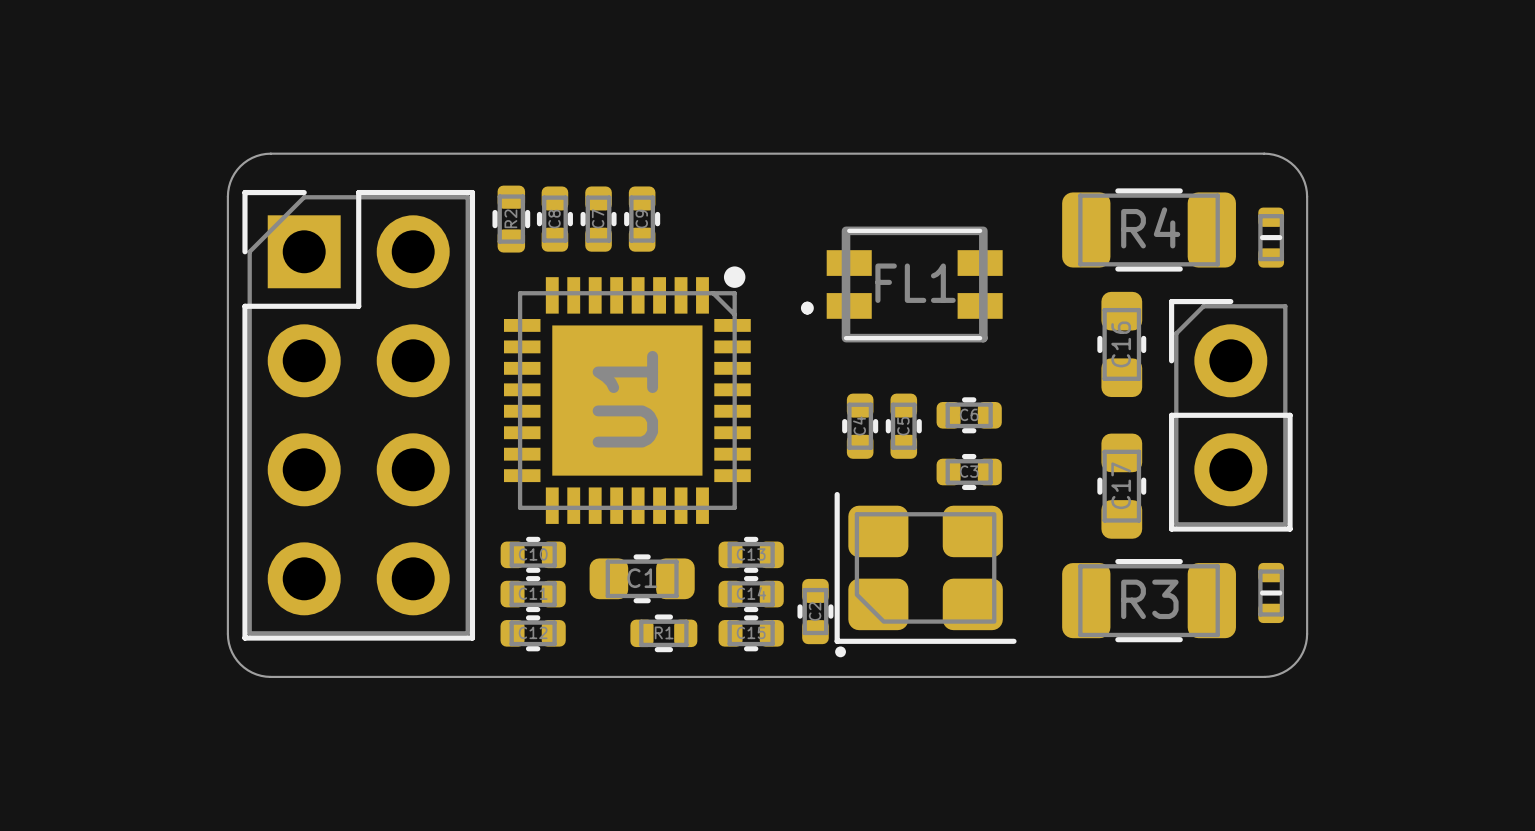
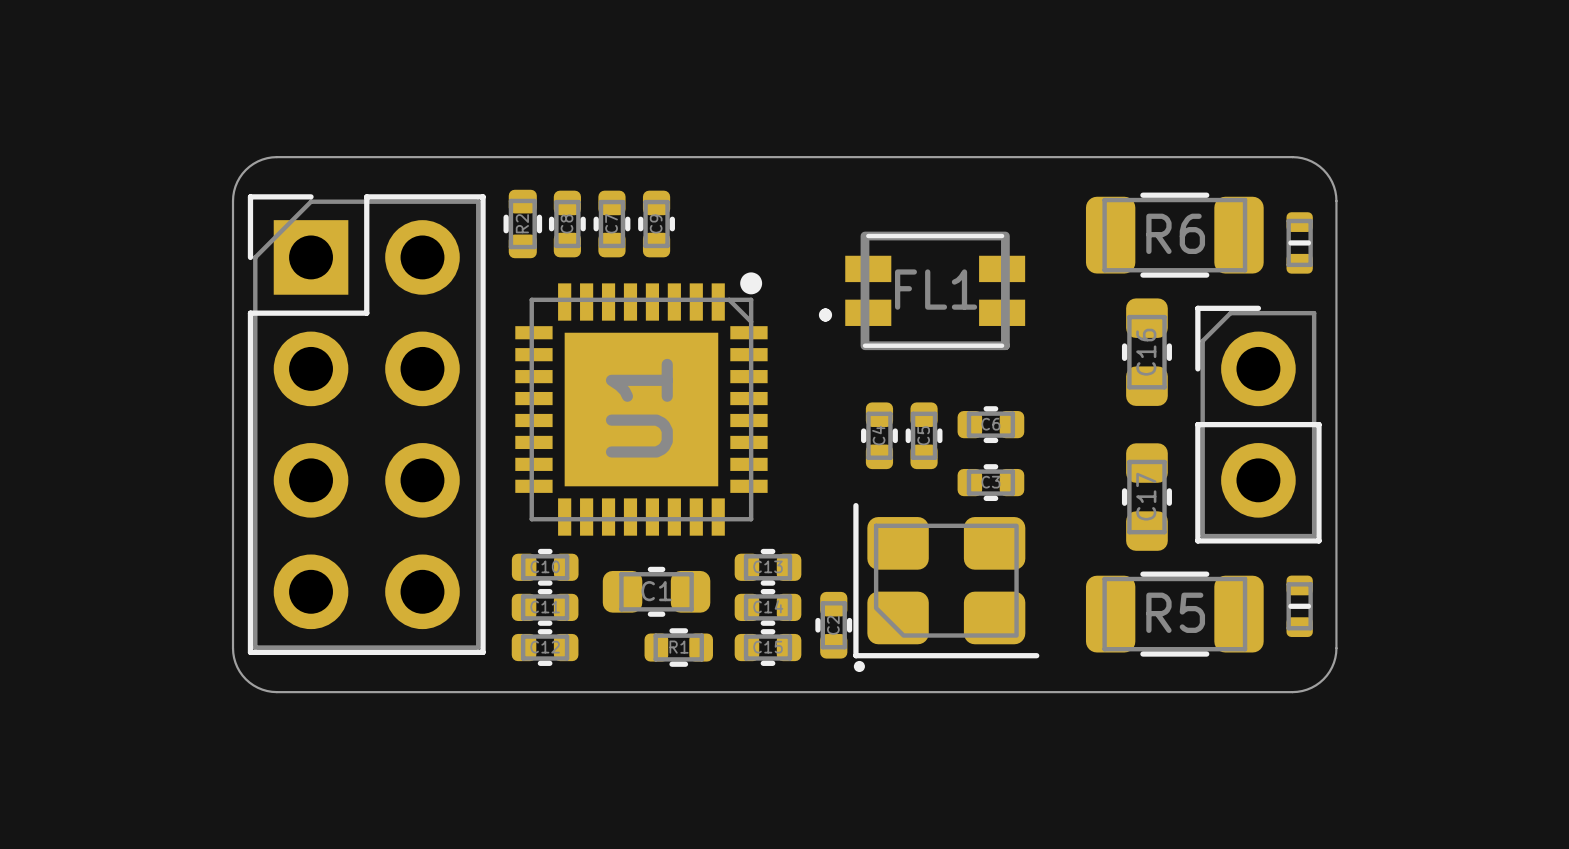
R4 name: R4 (1150, 227) -> R6 (1175, 233)
R3 name: R3 (1149, 599) -> R5 (1175, 612)

